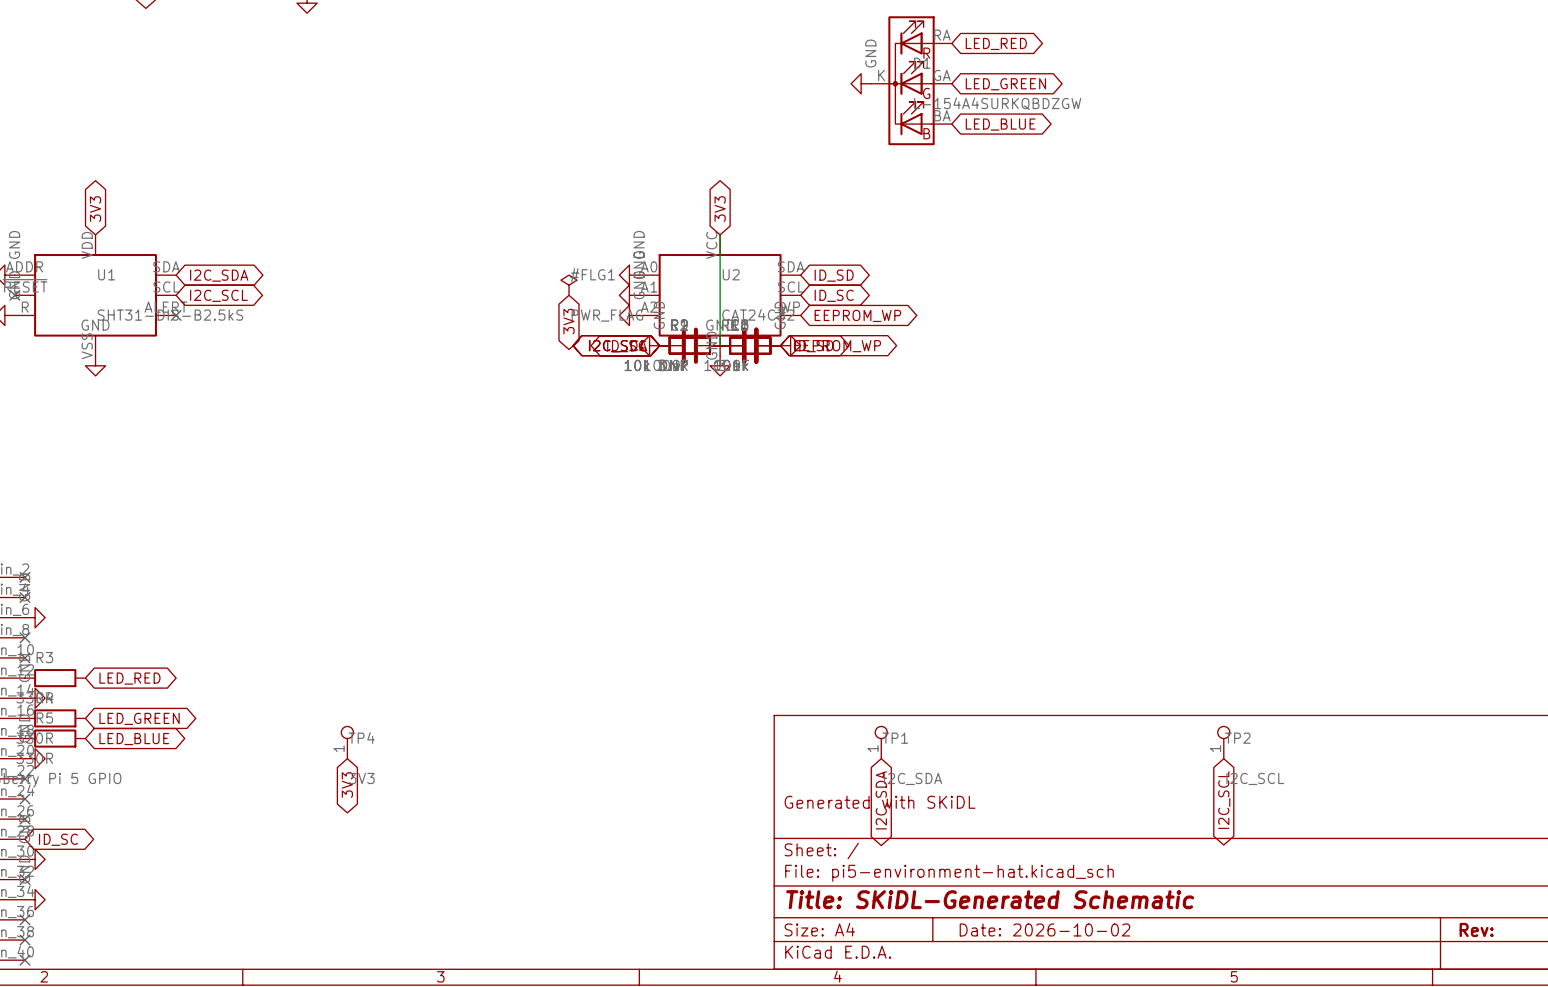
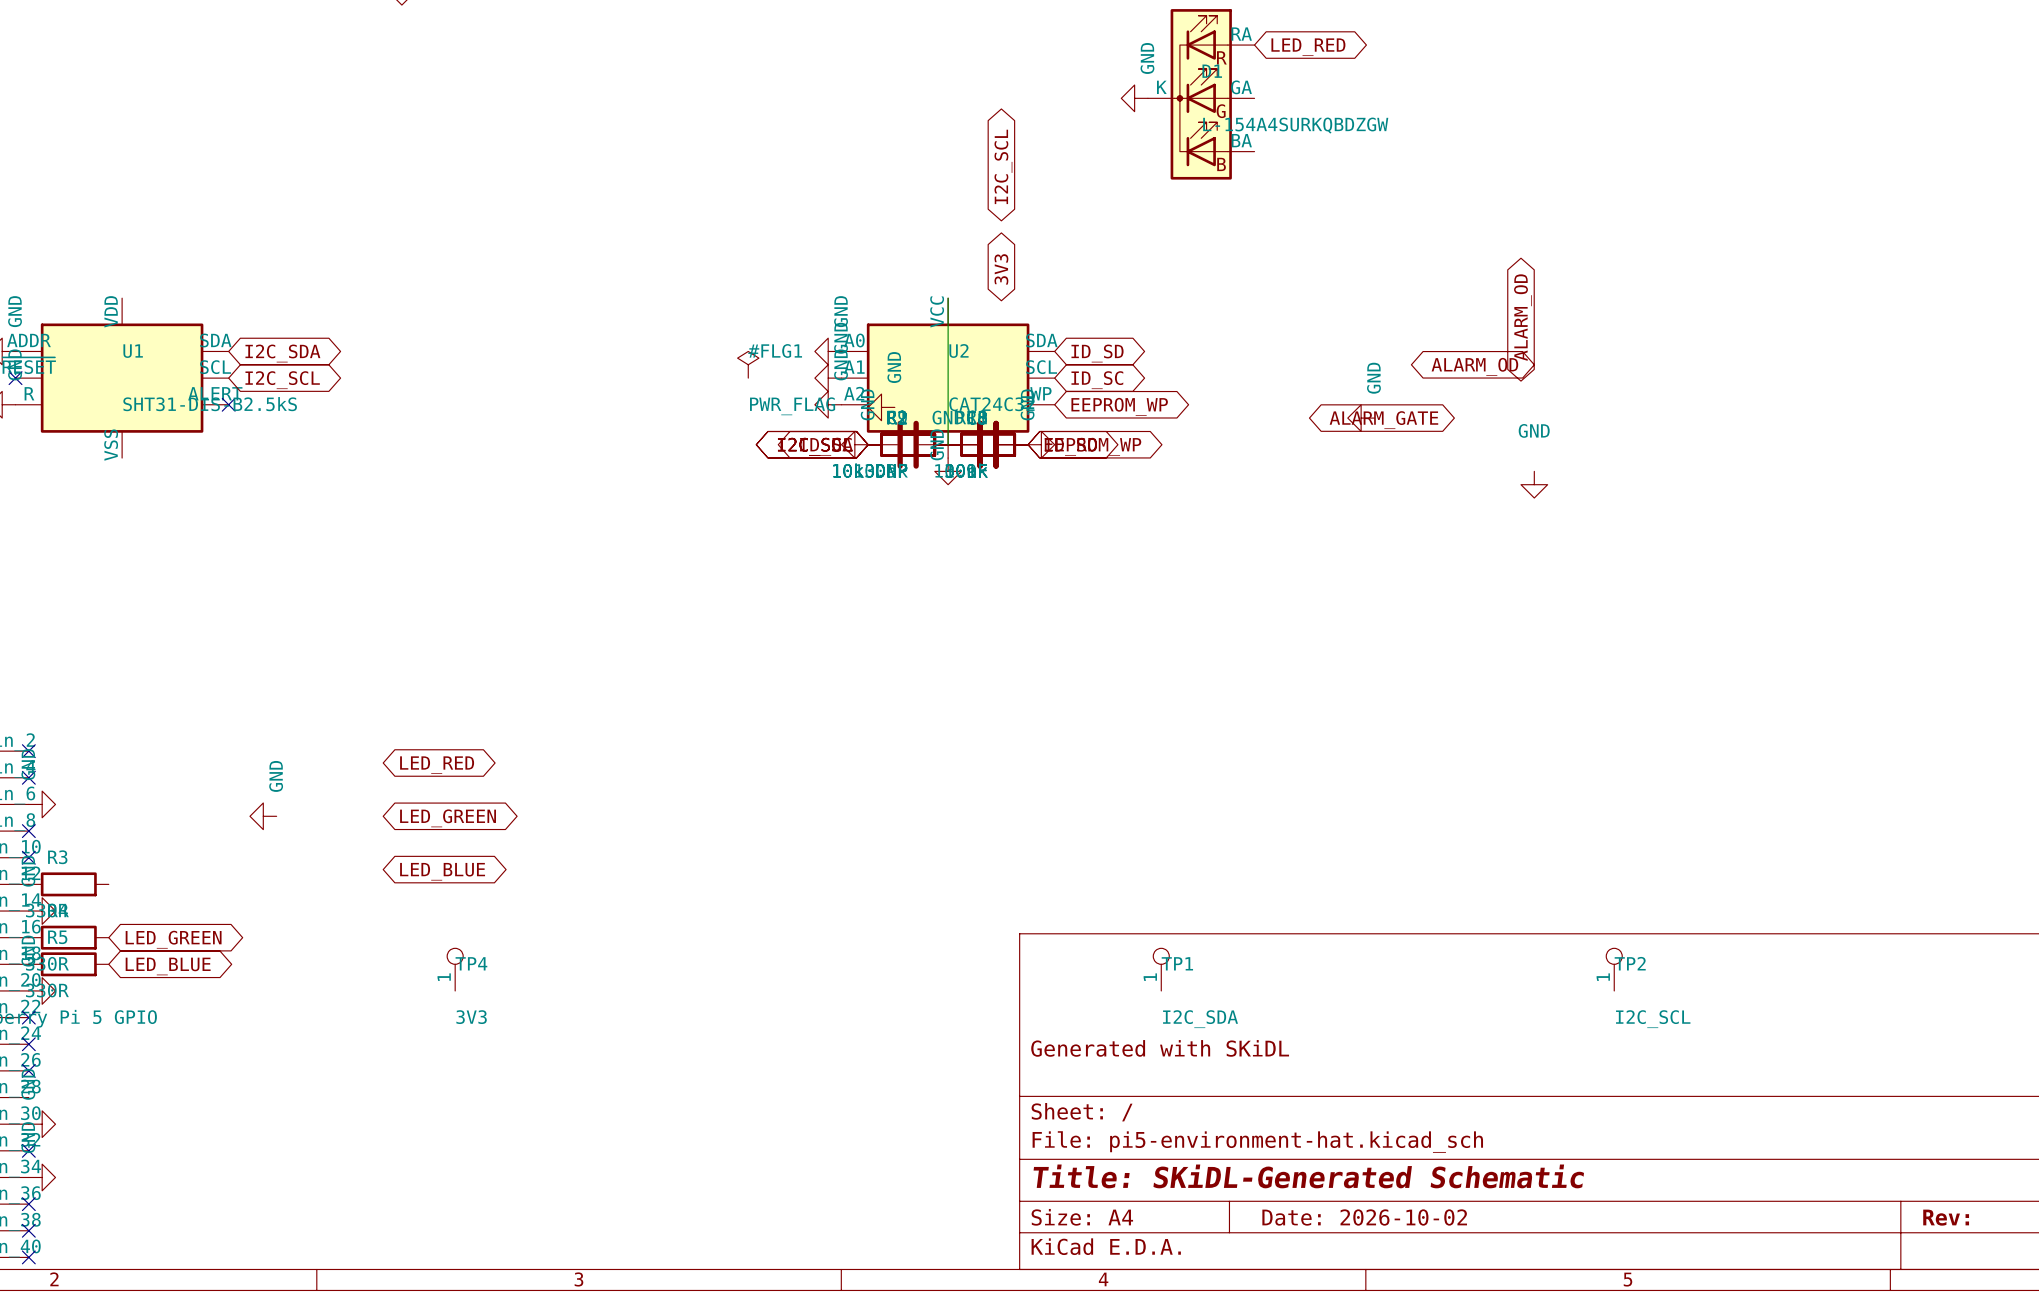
global label: LED_GREEN (1005, 84) -> none
global label: LED_BLUE (1000, 124) -> none
global label: none -> I2C_SCL (1003, 166)
global label: 3V3 (95, 209) -> none
global label position: 3V3 (720, 209) -> 3V3 (1001, 269)
global label: none -> ALARM_OD (1523, 317)
global label: none -> ALARM_OD (1474, 366)
power symbol: none -> GND (881, 407)
global label: 3V3 (569, 321) -> none
power symbol: none -> GND (1361, 418)
global label: none -> ALARM_GATE (1383, 420)
power symbol: GND (95, 365) -> none
power symbol: none -> GND (1534, 484)
global label: none -> LED_RED (437, 765)
power symbol: none -> GND (263, 816)
global label: none -> LED_GREEN (448, 818)
global label: none -> LED_BLUE (442, 871)
global label: LED_RED (129, 678) -> none
global label: 3V3 (347, 784) -> none
global label: I2C_SDA (881, 800) -> none
global label: I2C_SCL (1224, 800) -> none
global label: ID_SC (58, 839) -> none

